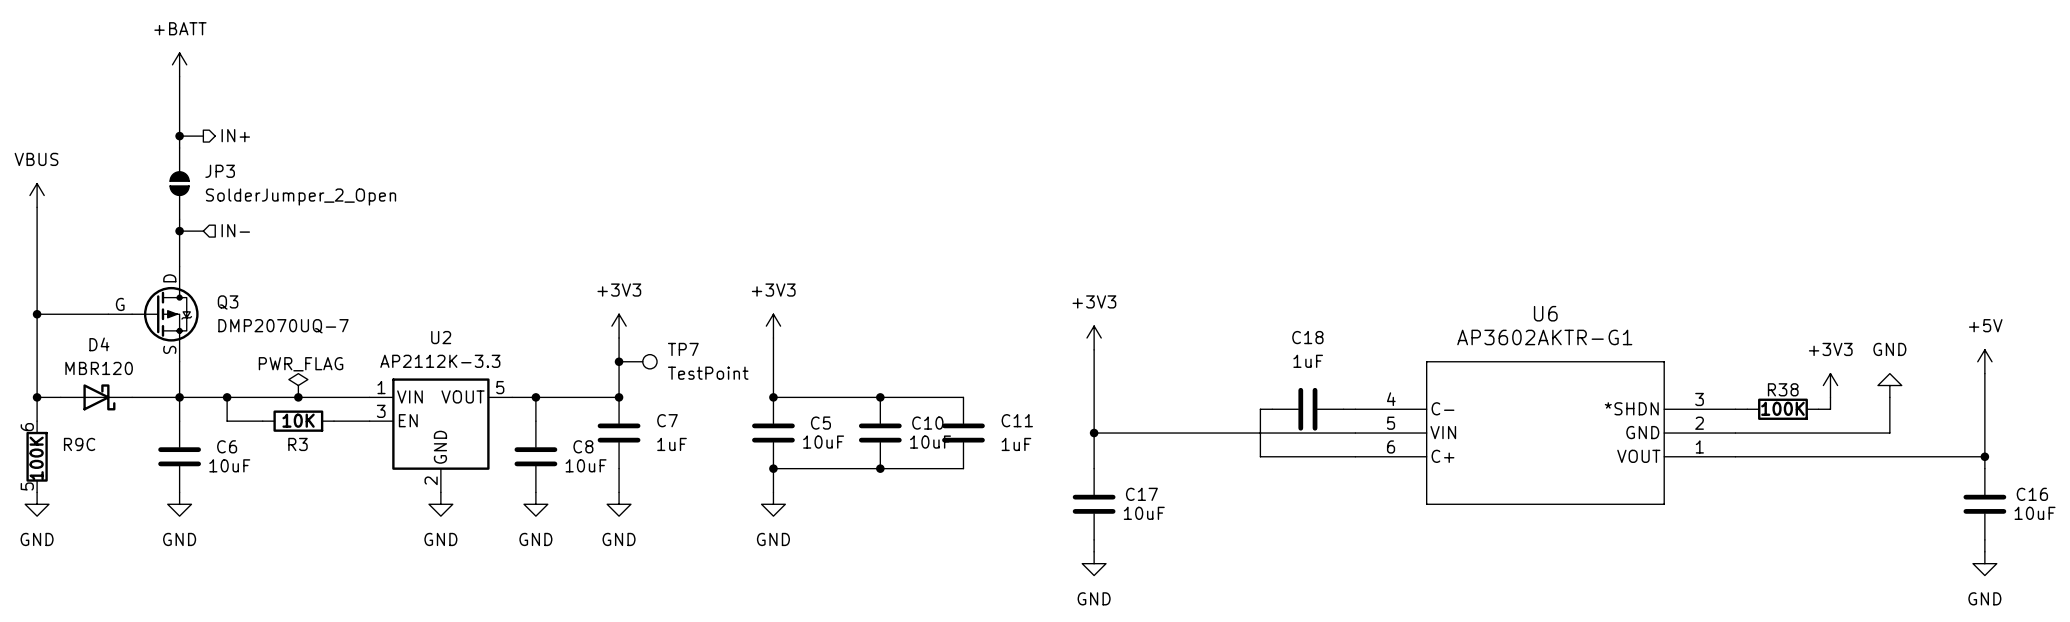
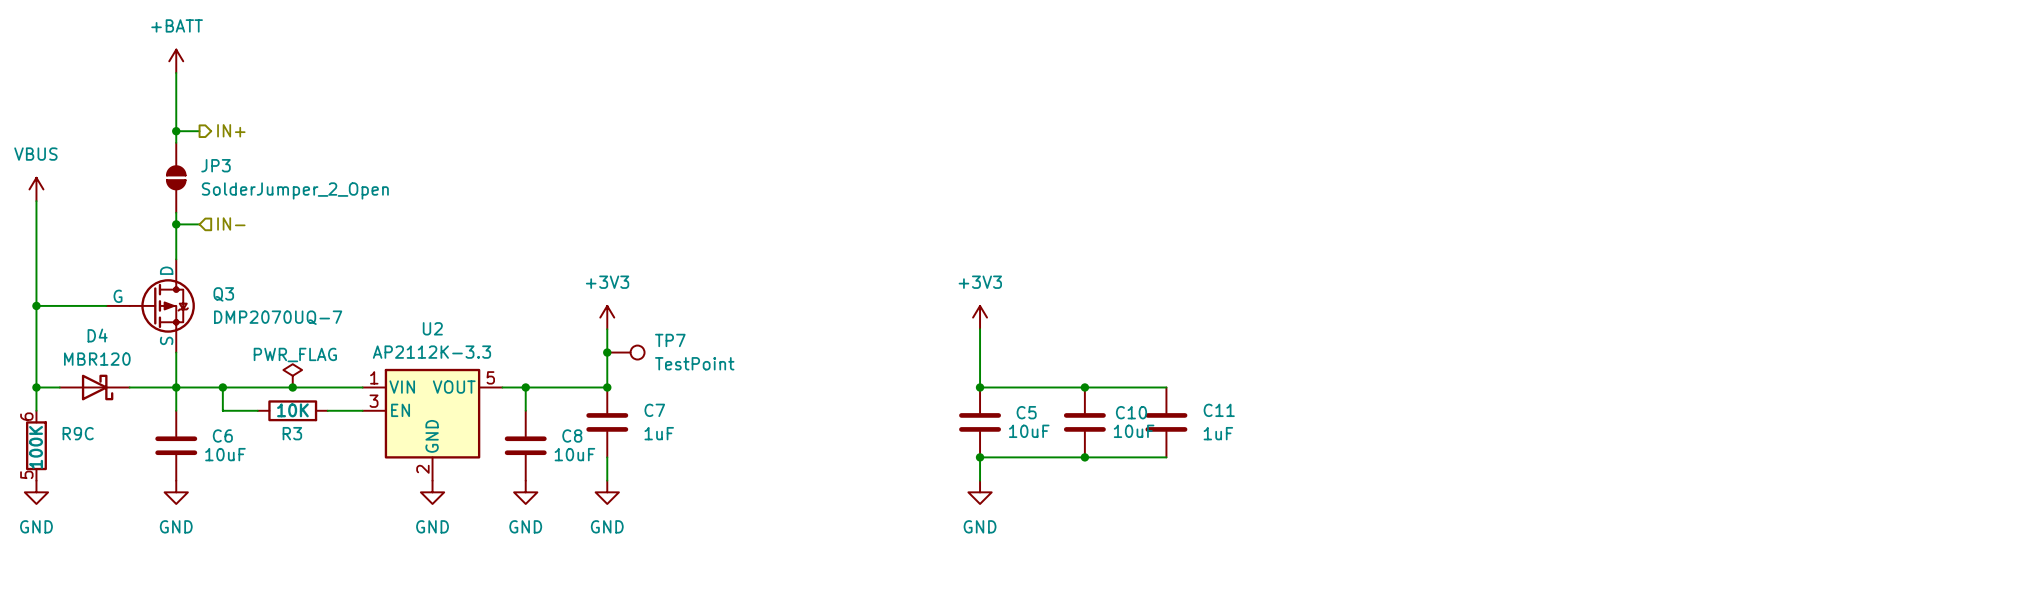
power symbol: +3V3 (773, 326) -> none
wire: (773, 338) (773, 397) (963, 397) -> (980, 329) (980, 387) (1166, 387)
power symbol position: +3V3 (1094, 338) -> +3V3 (980, 317)
wire: (1094, 349) (1094, 468) -> none
power symbol: +5V (1984, 361) -> none
wire: (1984, 373) (1984, 468) -> none
power symbol: +3V3 (1830, 385) -> none
power symbol: GND (1889, 385) -> none
junction: (773, 397) -> none
junction: (880, 397) -> none
junction: none -> (980, 387)
junction: none -> (1084, 387)
wire: (1830, 397) (1830, 409) (1818, 409) -> none
wire: (1889, 397) (1889, 433) (1735, 433) -> none
wire: (1272, 409) (1260, 409) (1260, 456) (1355, 456) -> none
C18: 1uF (1307, 409) -> none
wire: (1343, 409) (1355, 409) -> none
wire: (1735, 409) (1747, 409) -> none
R38: 100K (1782, 409) -> none
C5 position: (773, 433) -> (980, 422)
C10 position: (880, 433) -> (1084, 422)
C11 position: (963, 433) -> (1166, 422)
wire: (1094, 433) (1355, 433) -> none
junction: (1094, 433) -> none
U6: AP3602AKTR-G1 (1545, 433) -> none
wire: (1735, 456) (1984, 456) -> none
junction: (1984, 456) -> none
junction: (773, 468) -> none
junction: (880, 468) -> none
wire: (963, 468) (773, 468) (773, 492) -> (1166, 457) (980, 457) (980, 480)
junction: none -> (980, 457)
junction: none -> (1084, 457)
power symbol: GND (773, 504) -> none
C17: 10uF (1094, 504) -> none
C16: 10uF (1984, 504) -> none
wire: (1094, 539) (1094, 551) -> none
wire: (1984, 539) (1984, 551) -> none
power symbol position: GND (1094, 563) -> GND (980, 492)
power symbol: GND (1984, 563) -> none

